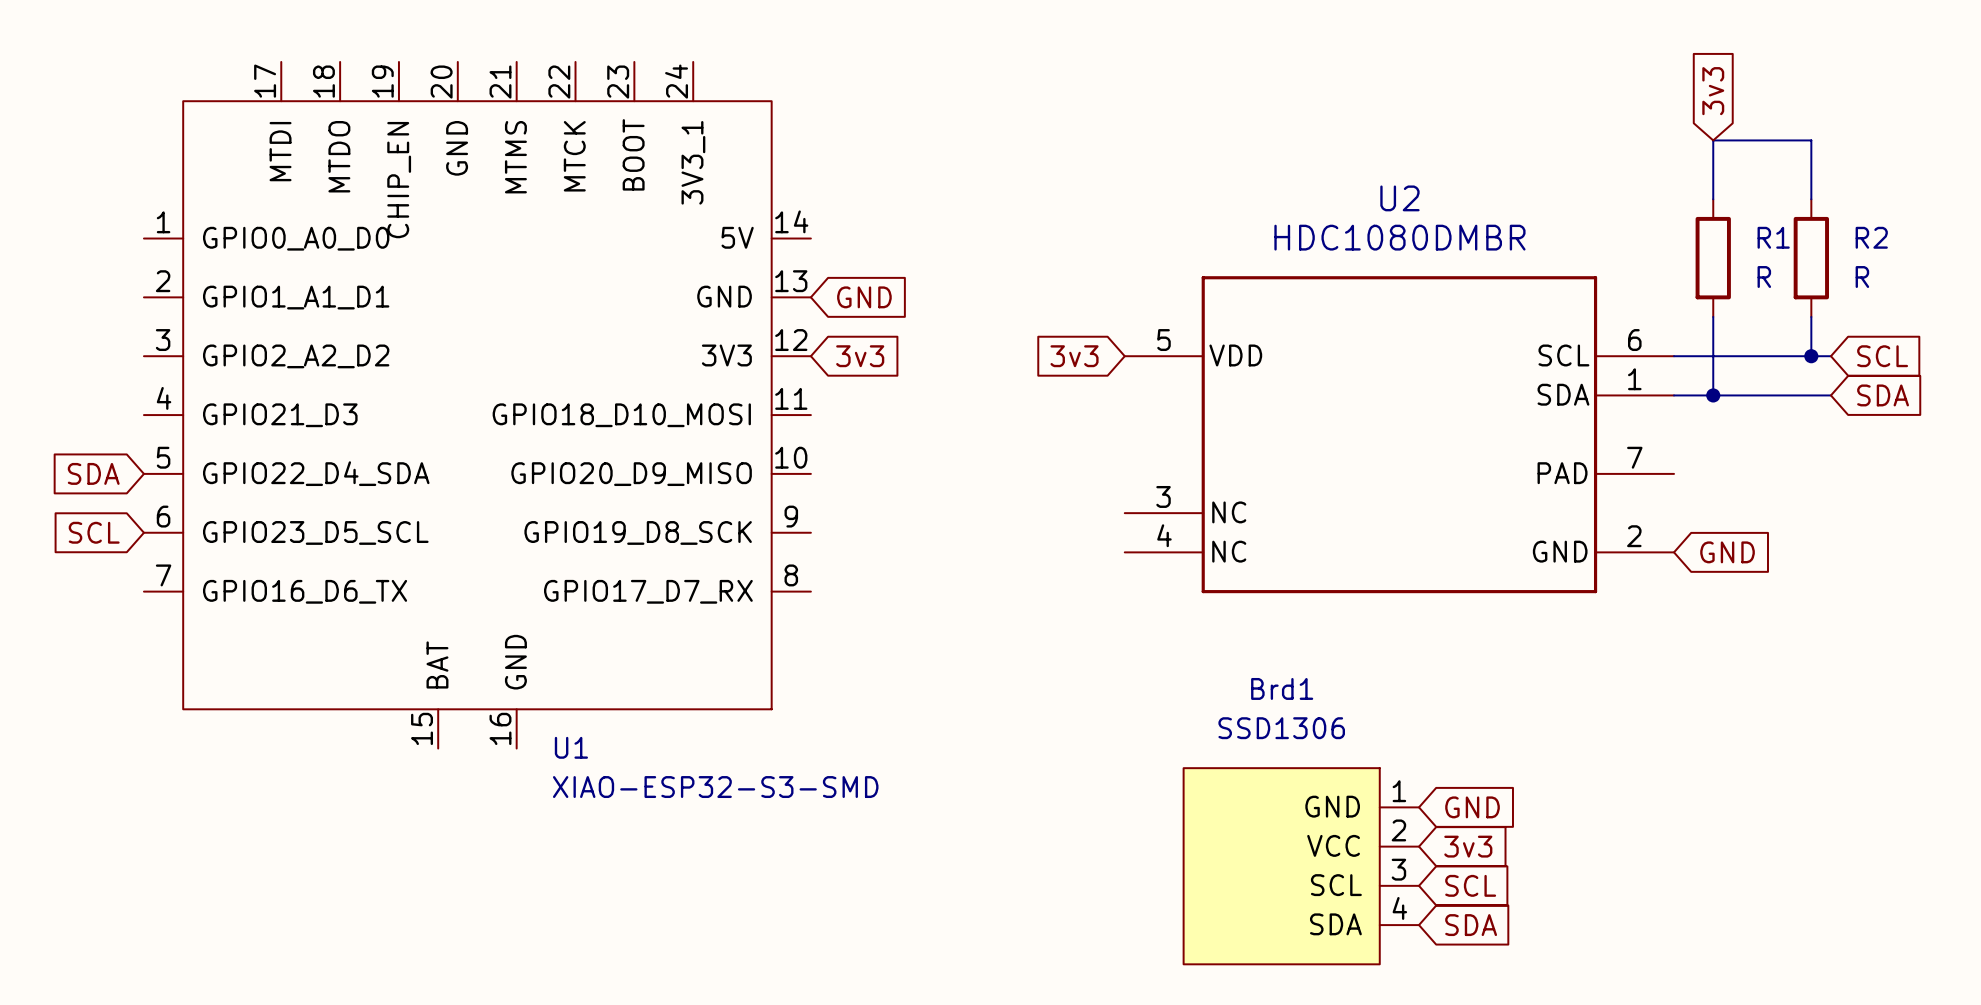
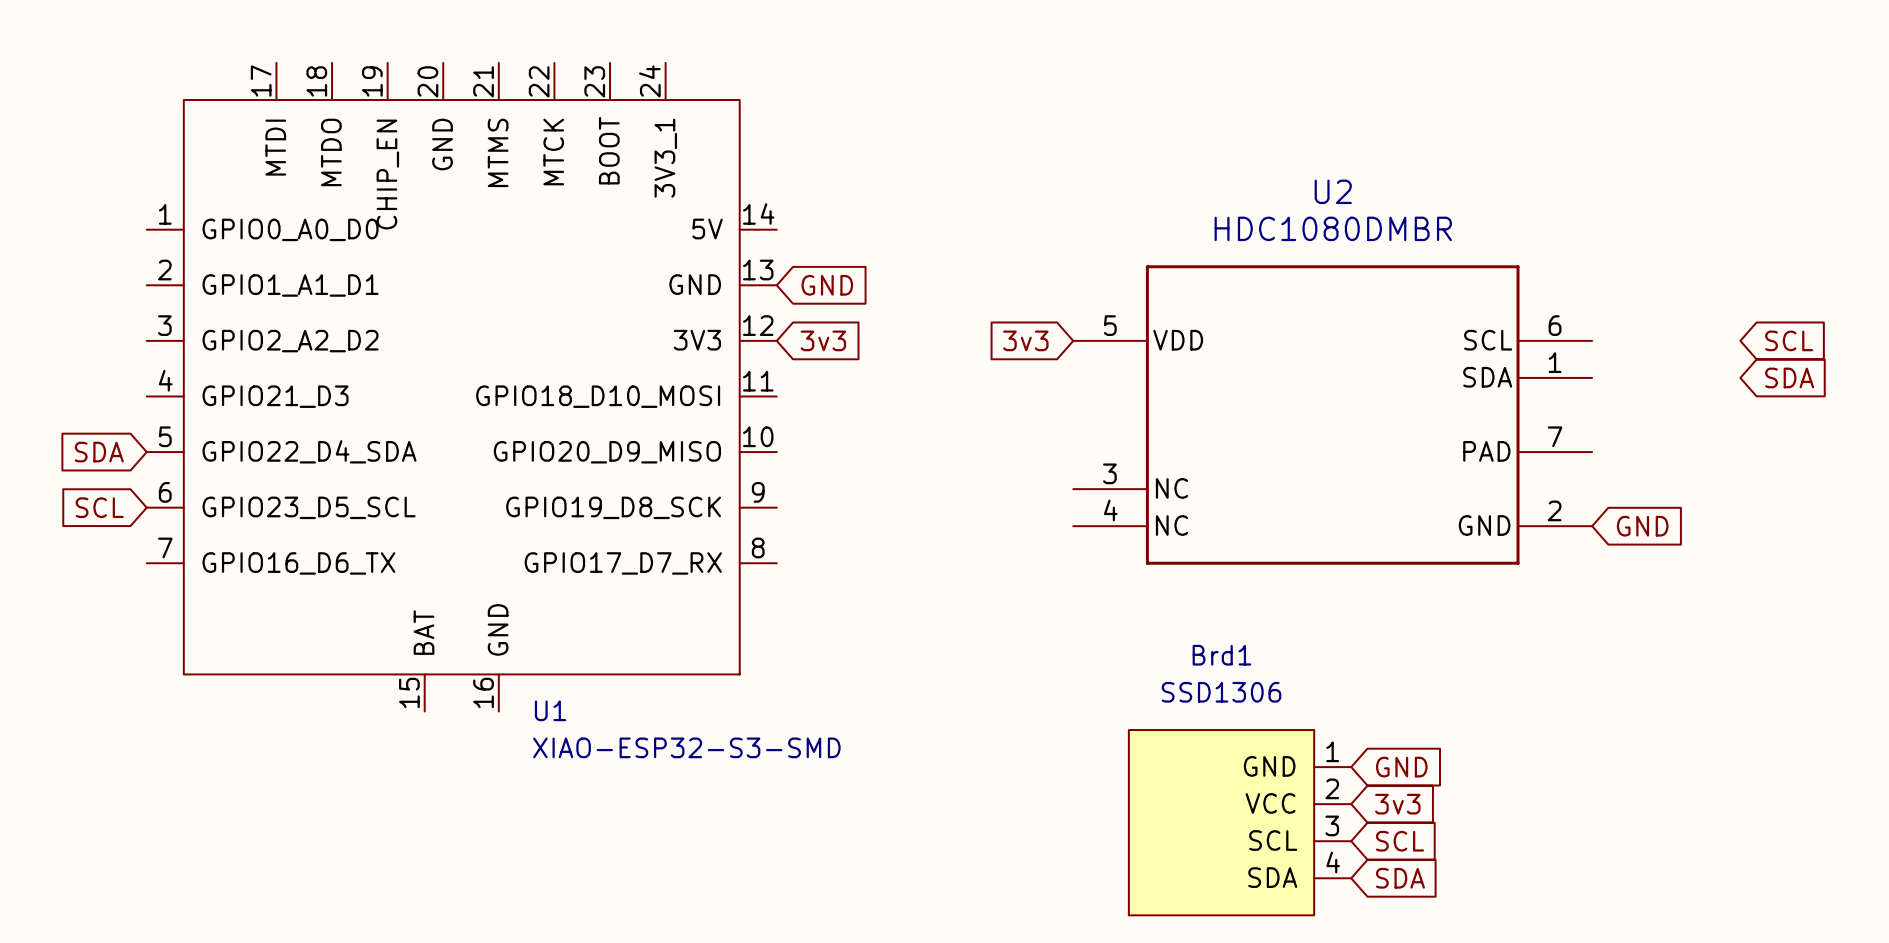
global label: 3v3 (1713, 91) -> none
wire: (1713, 199) (1713, 140) (1811, 140) (1811, 199) -> none
R1: R (1713, 258) -> none
R2: R (1811, 258) -> none
wire: (1713, 316) (1713, 395) -> none
wire: (1811, 316) (1811, 356) -> none
wire: (1674, 356) (1830, 356) -> none
junction: (1811, 356) -> none
wire: (1674, 395) (1830, 395) -> none
junction: (1713, 395) -> none

